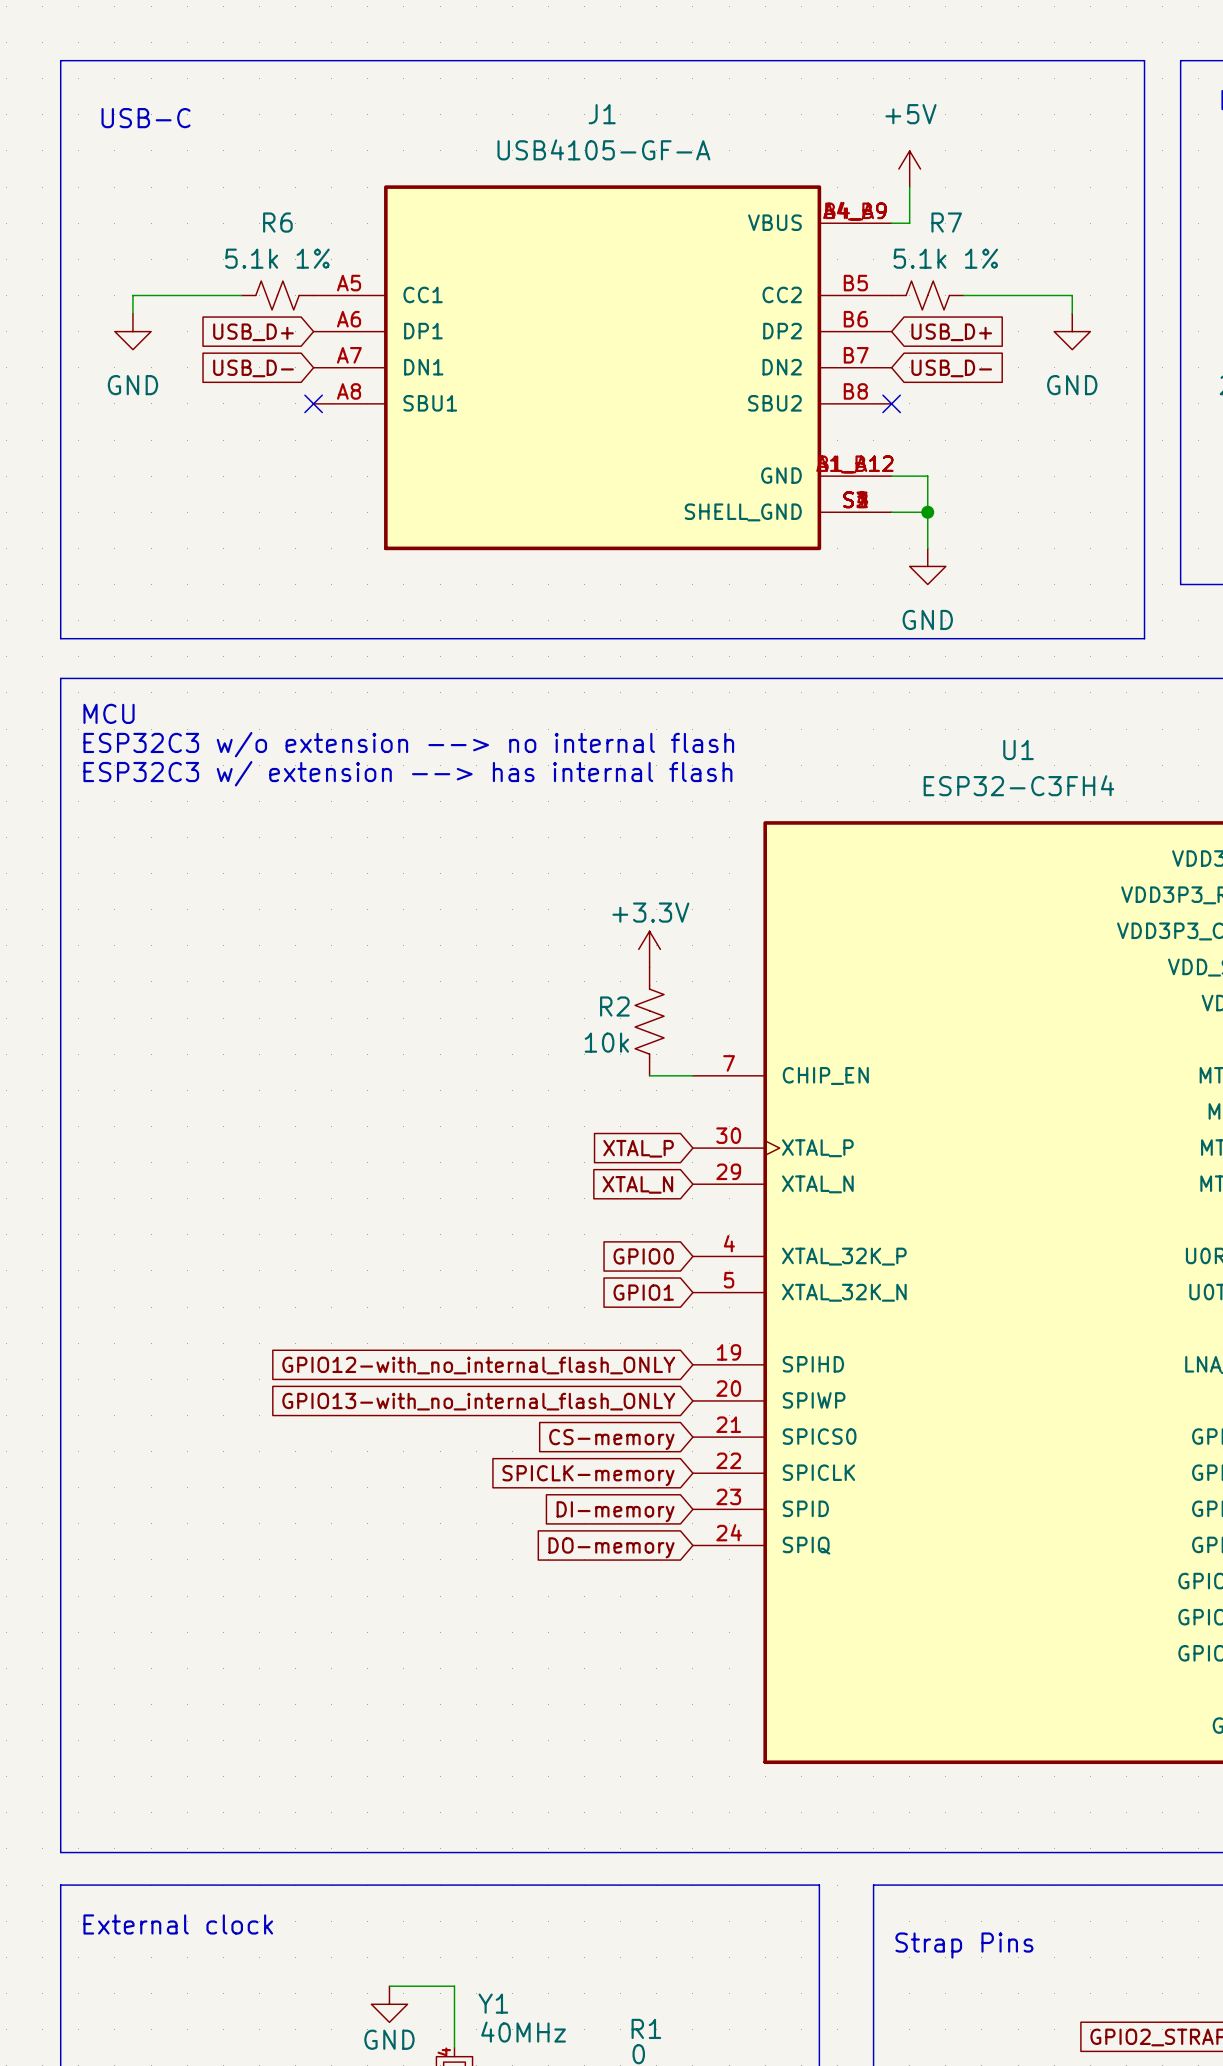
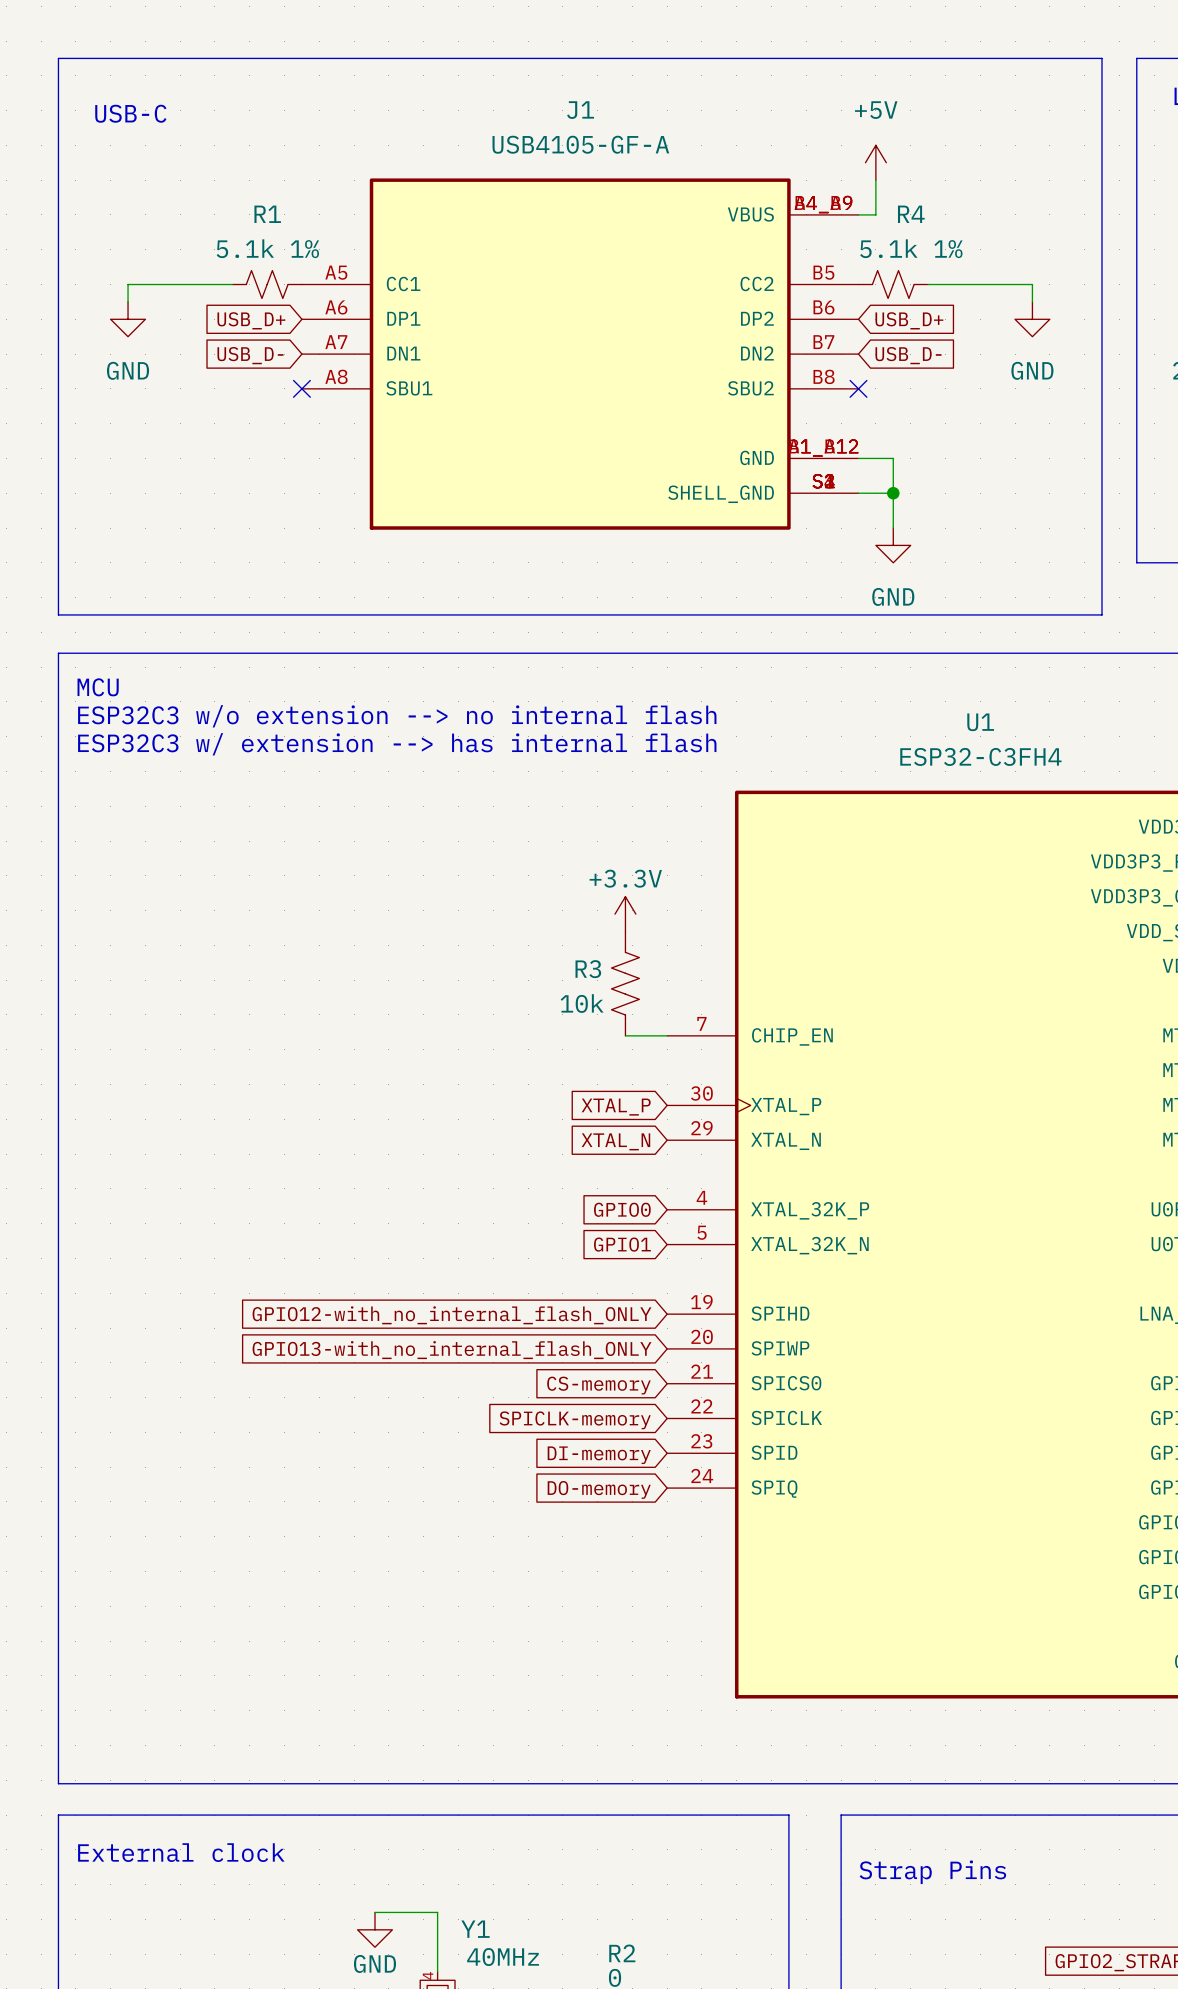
R6 name: R6 (277, 222) -> R1 (267, 214)
R7 name: R7 (946, 222) -> R4 (911, 214)
R2 name: R2 (614, 1006) -> R3 (588, 969)
R1 name: R1 (646, 2028) -> R2 (622, 1953)

